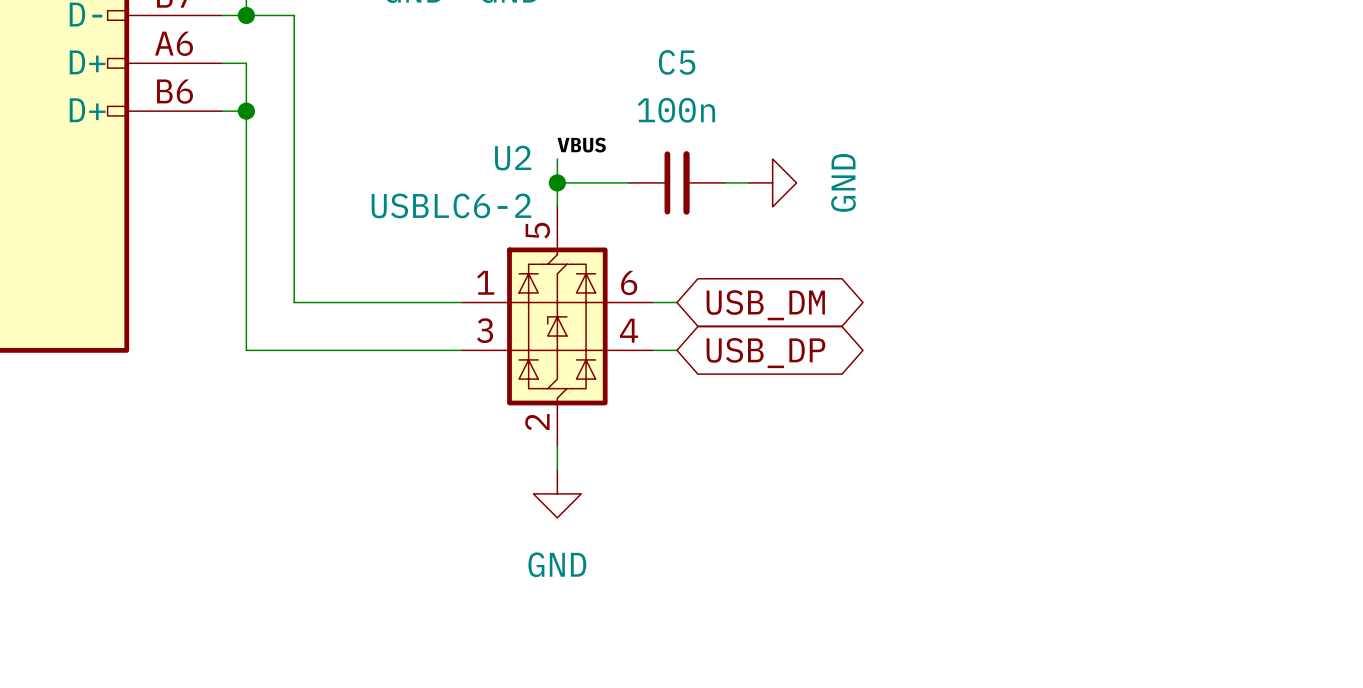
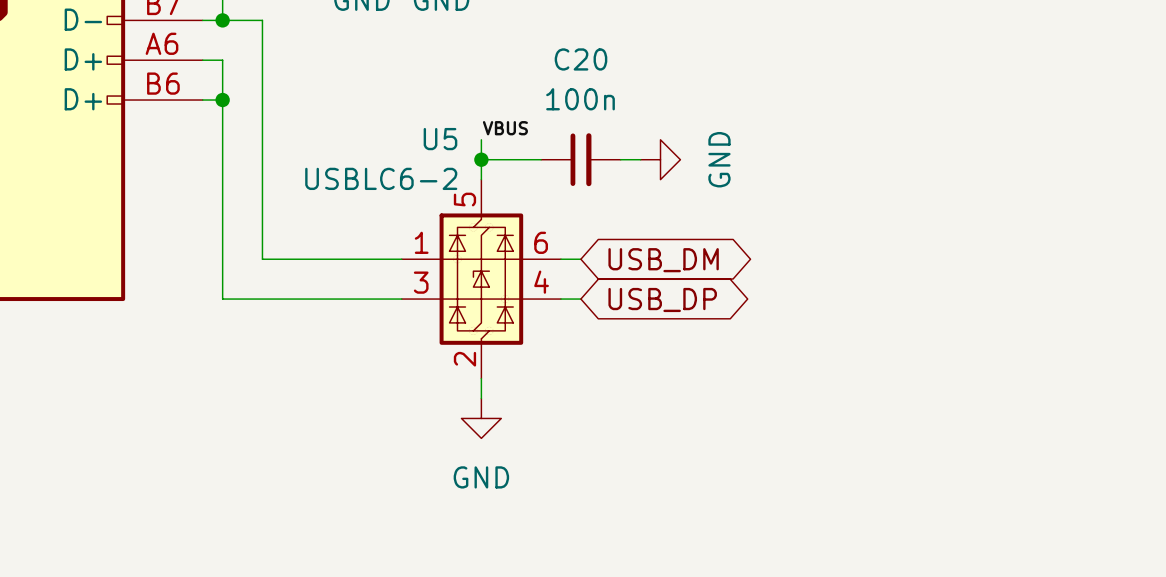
C5 name: C5 (677, 62) -> C20 (580, 59)
U2 name: U2 (513, 158) -> U5 (440, 139)

